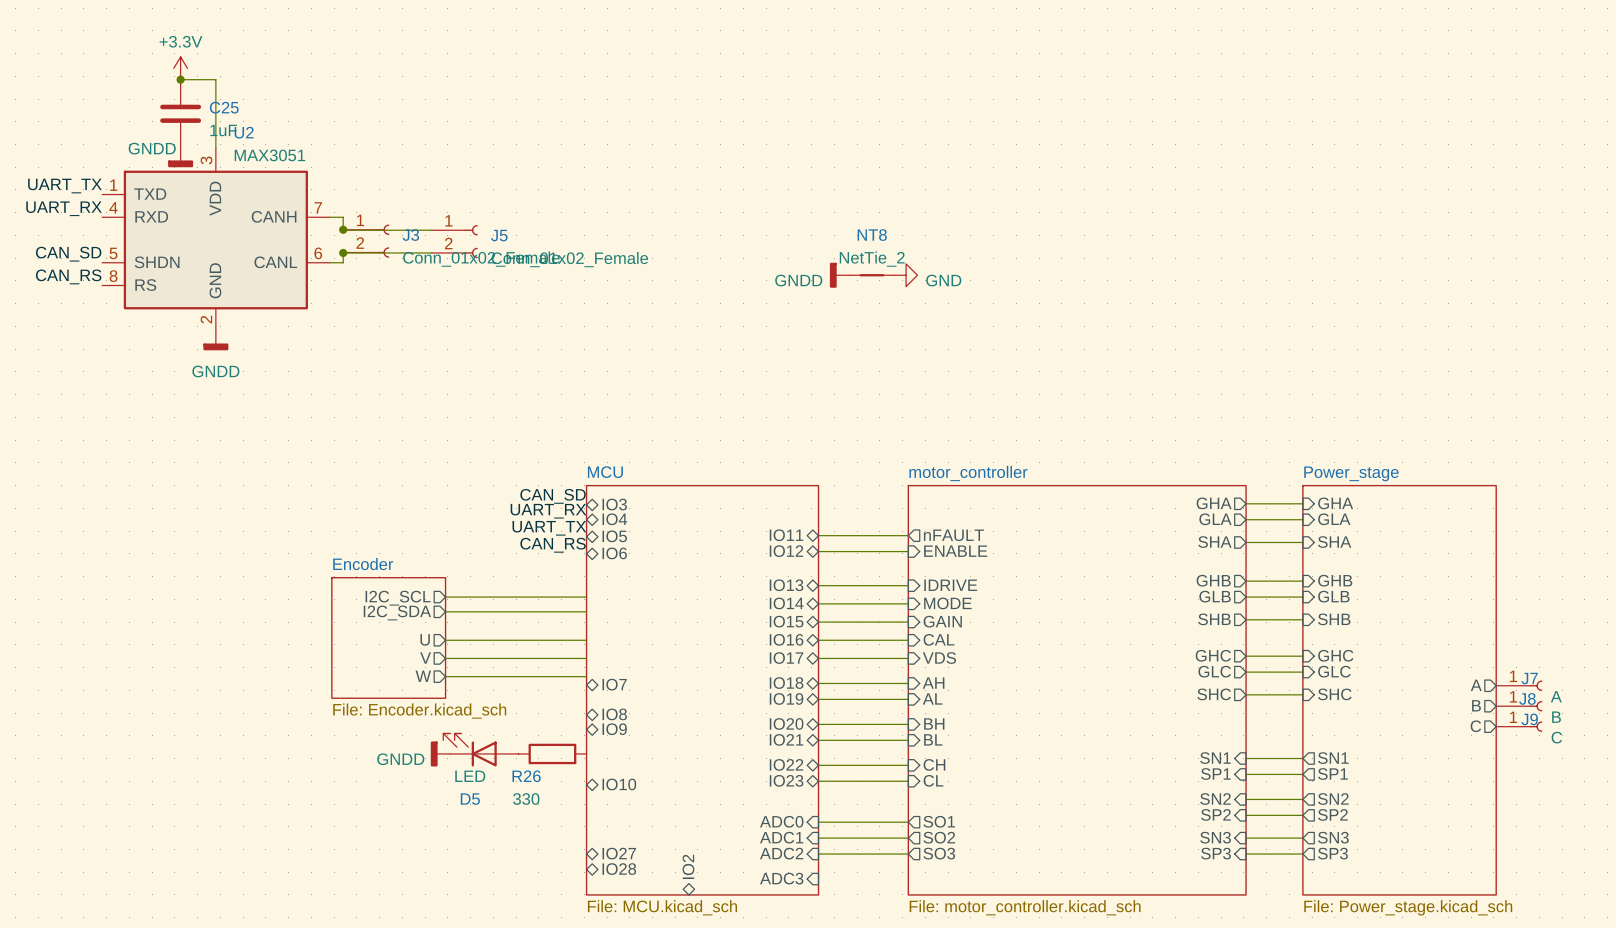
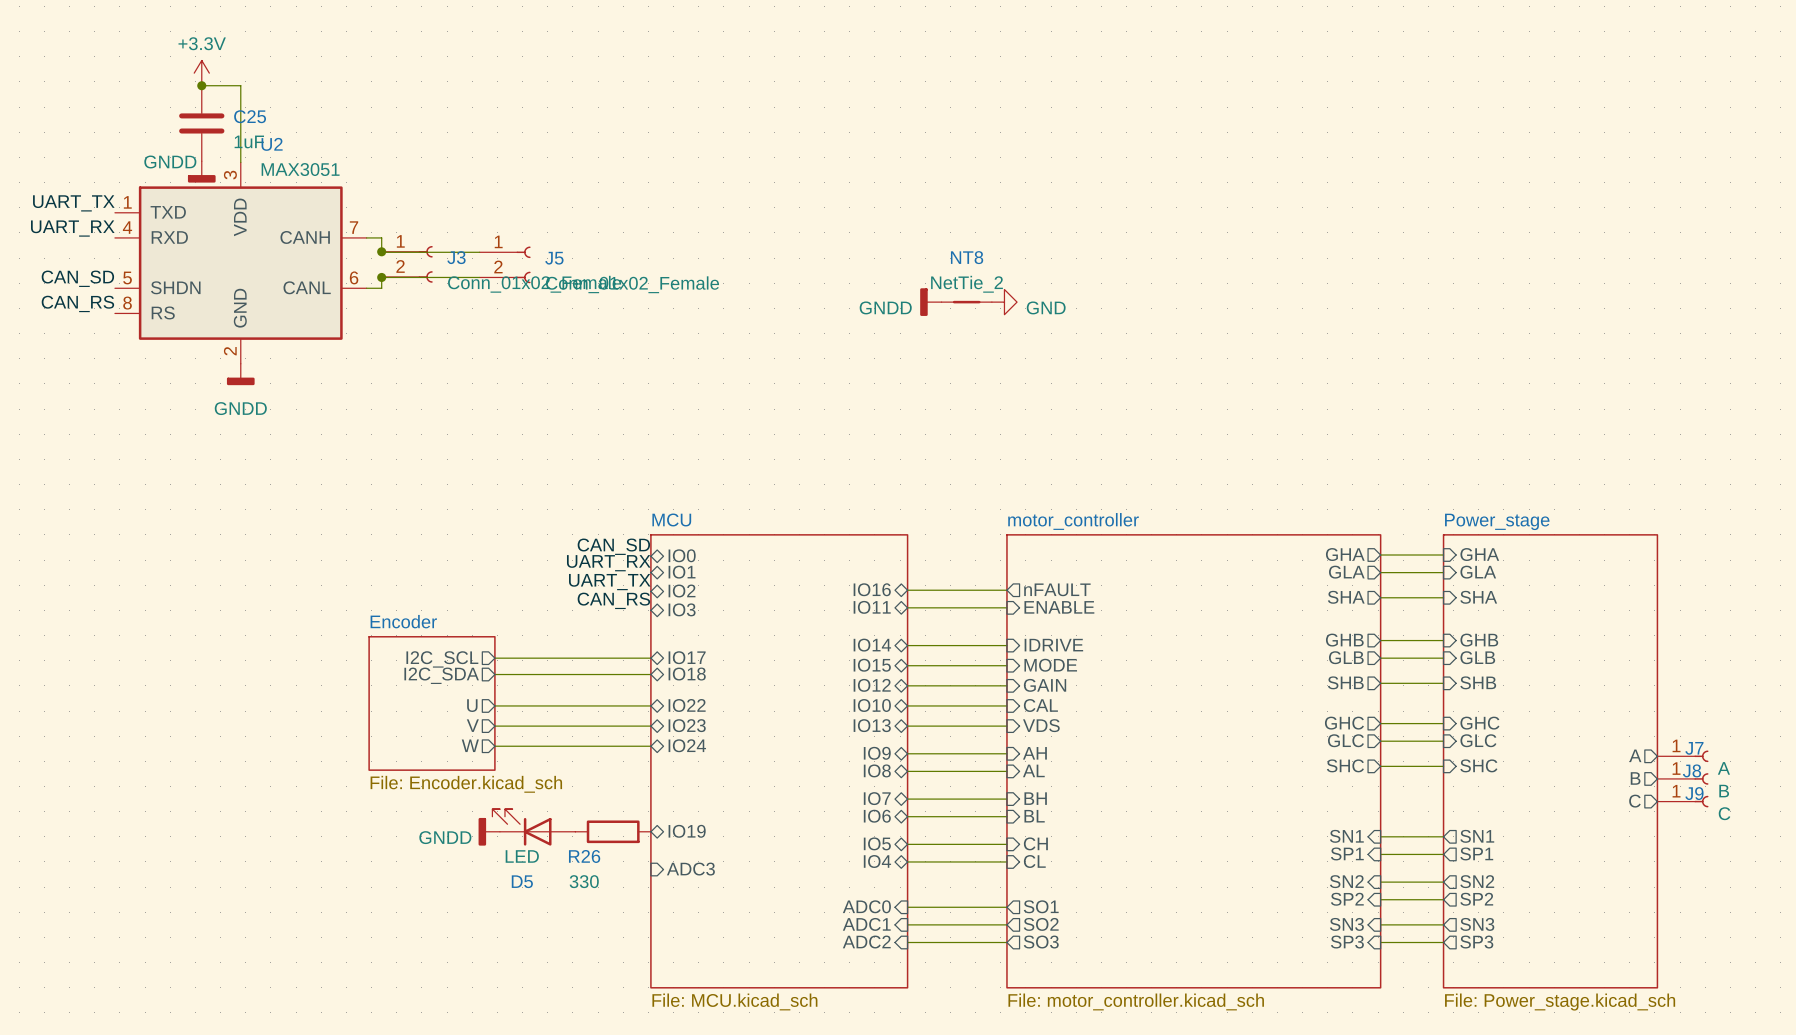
sheet pin: IO3 (614, 504) -> IO0 (682, 555)
sheet pin: IO4 (614, 519) -> IO1 (682, 572)
sheet pin: IO11 (786, 535) -> IO16 (872, 589)
sheet pin: IO5 (614, 536) -> IO2 (682, 591)
sheet pin: IO12 (786, 551) -> IO11 (872, 607)
sheet pin: IO6 (614, 553) -> IO3 (682, 609)
sheet pin: IO13 (786, 585) -> IO14 (872, 645)
sheet pin: none -> IO17 (687, 657)
sheet pin: IO14 (786, 603) -> IO15 (872, 665)
sheet pin: none -> IO18 (687, 674)
sheet pin: IO15 (786, 621) -> IO12 (872, 685)
sheet pin: none -> IO22 (687, 705)
sheet pin: IO16 (786, 639) -> IO10 (872, 705)
sheet pin: none -> IO23 (687, 725)
sheet pin: IO17 (786, 658) -> IO13 (872, 725)
sheet pin: IO18 (786, 683) -> IO9 (877, 753)
sheet pin: IO7 (614, 684) -> IO24 (687, 745)
sheet pin: IO19 (786, 698) -> IO8 (877, 770)
sheet pin: IO8 (614, 714) -> none
sheet pin: IO20 (786, 723) -> IO7 (877, 798)
sheet pin: IO9 (614, 729) -> none
sheet pin: IO21 (786, 739) -> IO6 (877, 816)
sheet pin: none -> IO19 (687, 831)
sheet pin: IO22 (786, 764) -> IO5 (877, 843)
sheet pin: IO23 (786, 780) -> IO4 (877, 861)
sheet pin: IO10 (619, 784) -> none
sheet pin: IO27 (619, 853) -> none
sheet pin: IO2 (688, 866) -> none
sheet pin: IO28 (619, 869) -> none
sheet pin rotation: 0° (781, 878) -> 180° (690, 869)
sheet pin position: ADC3 (781, 878) -> ADC3 (690, 869)

